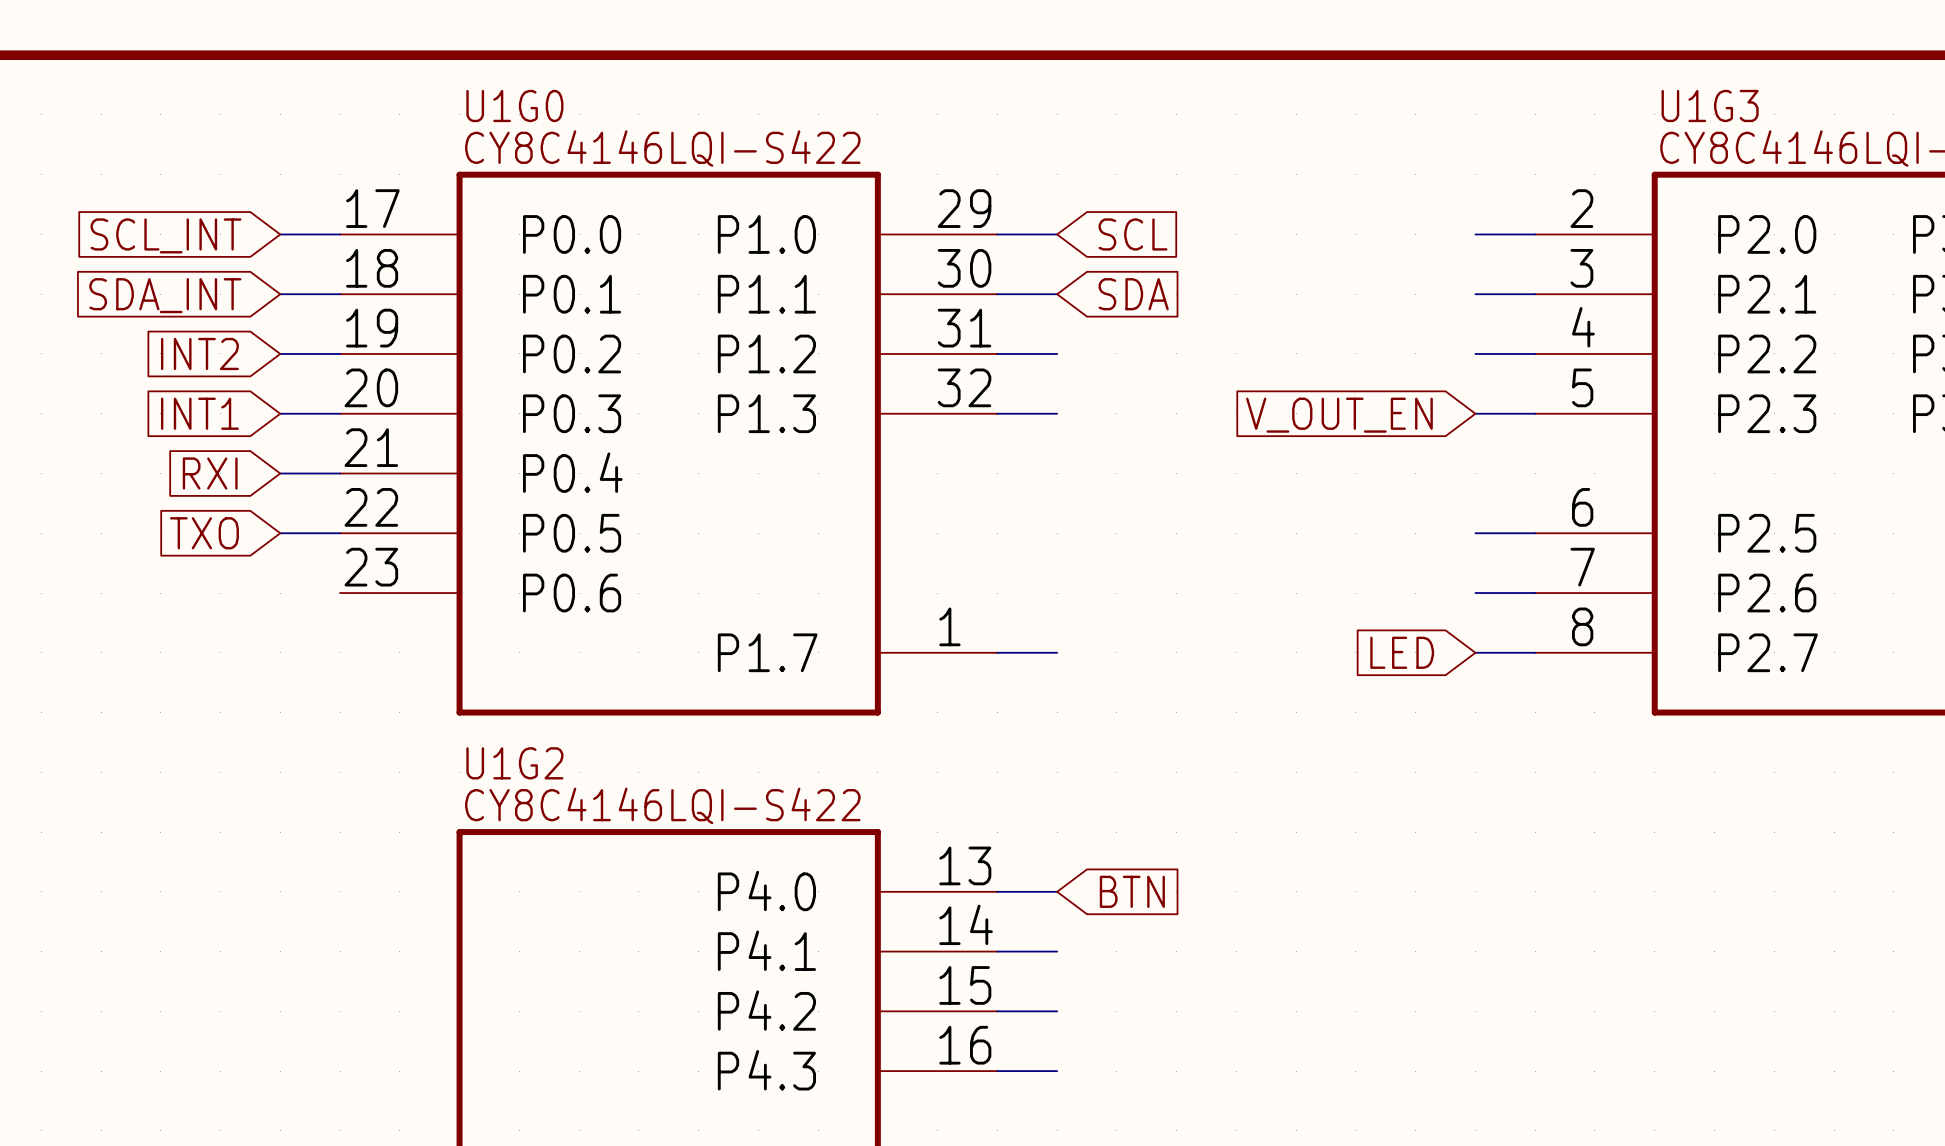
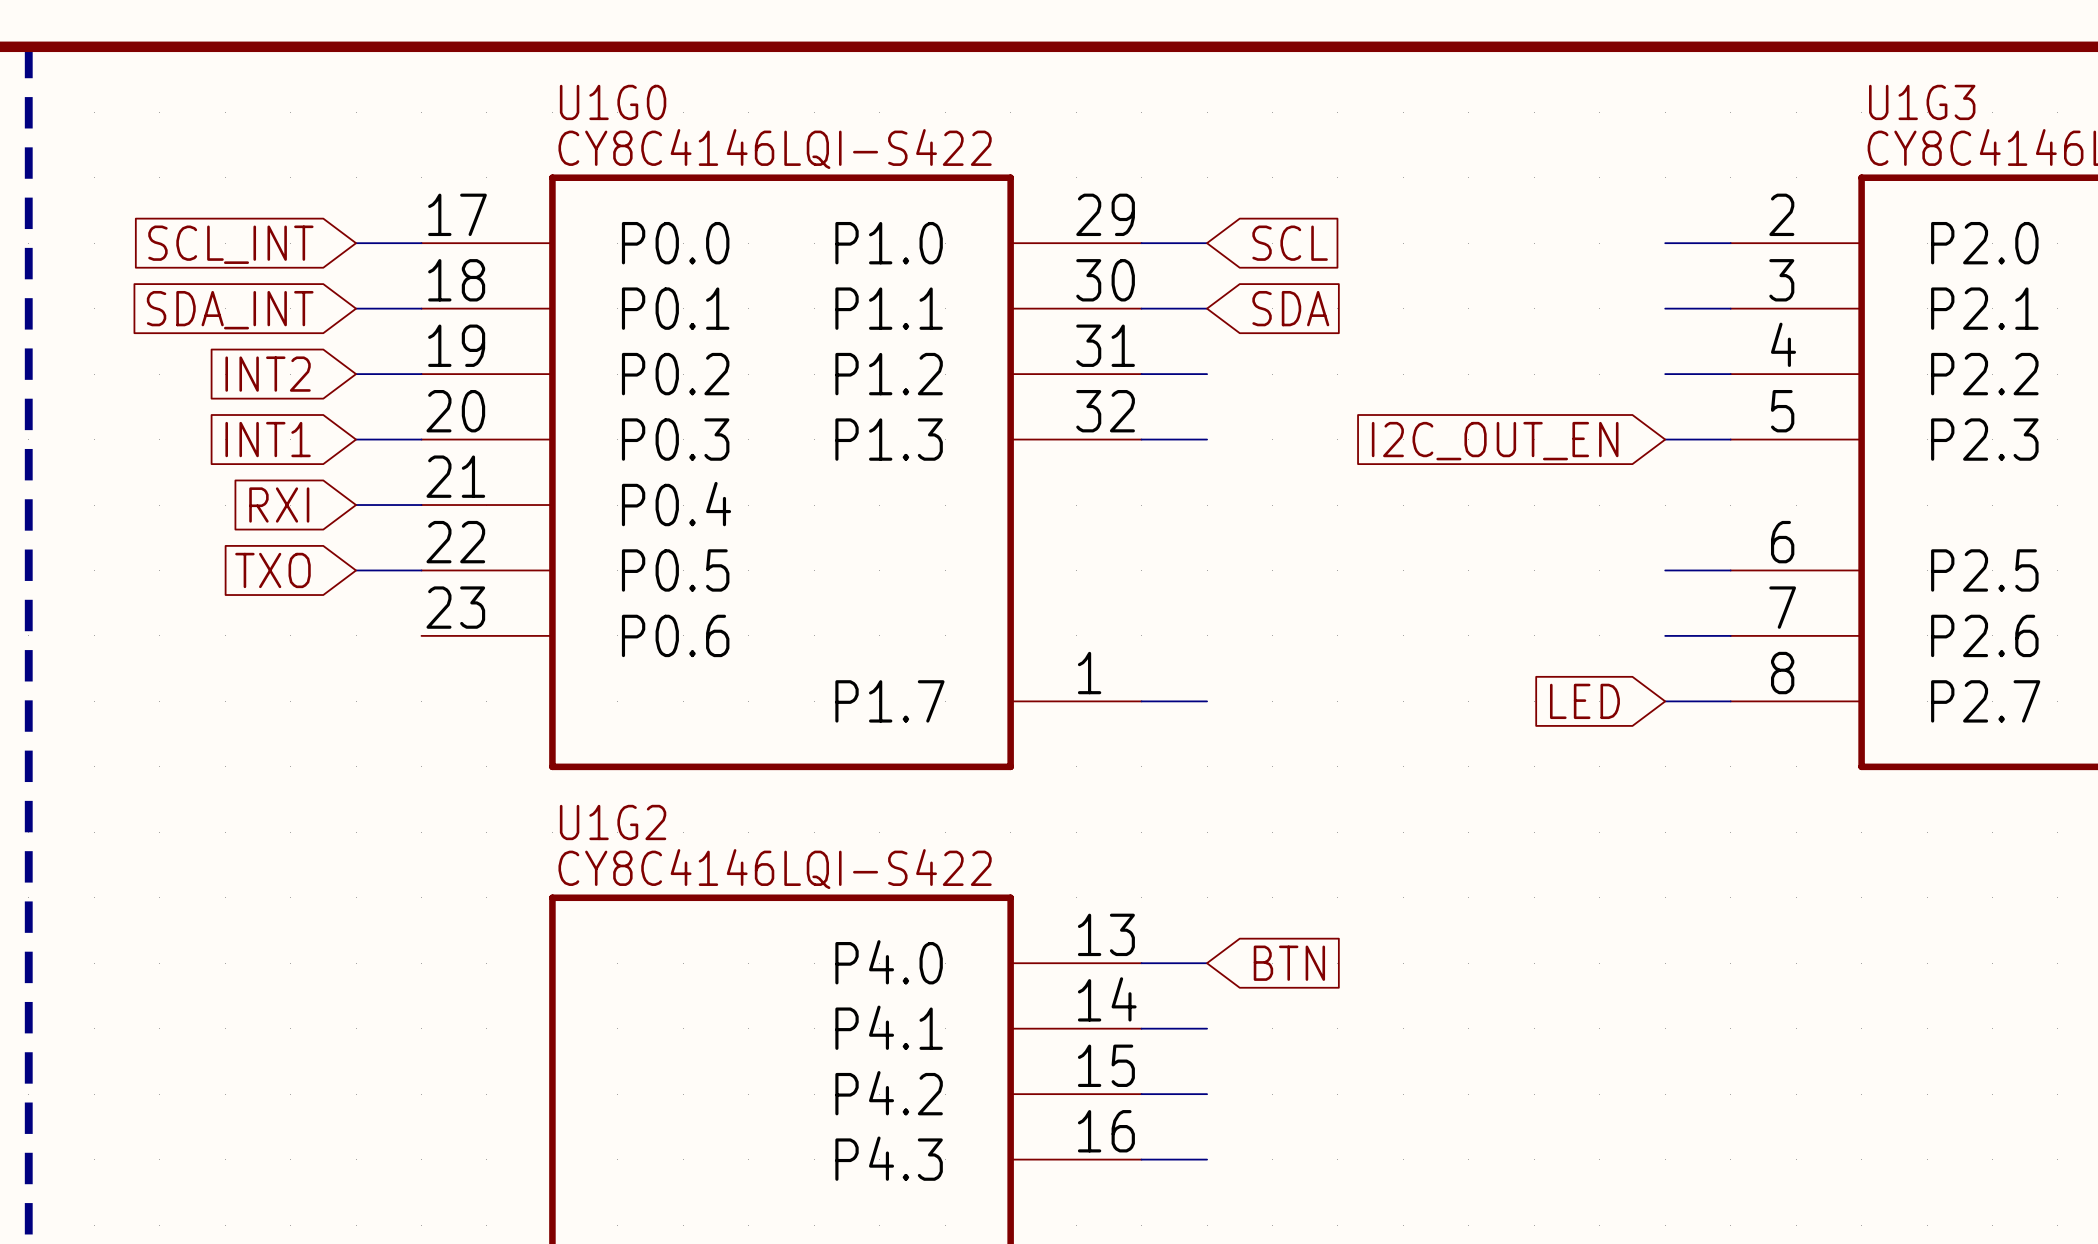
global label: V_OUT_EN (1339, 415) -> I2C_OUT_EN (1495, 441)

